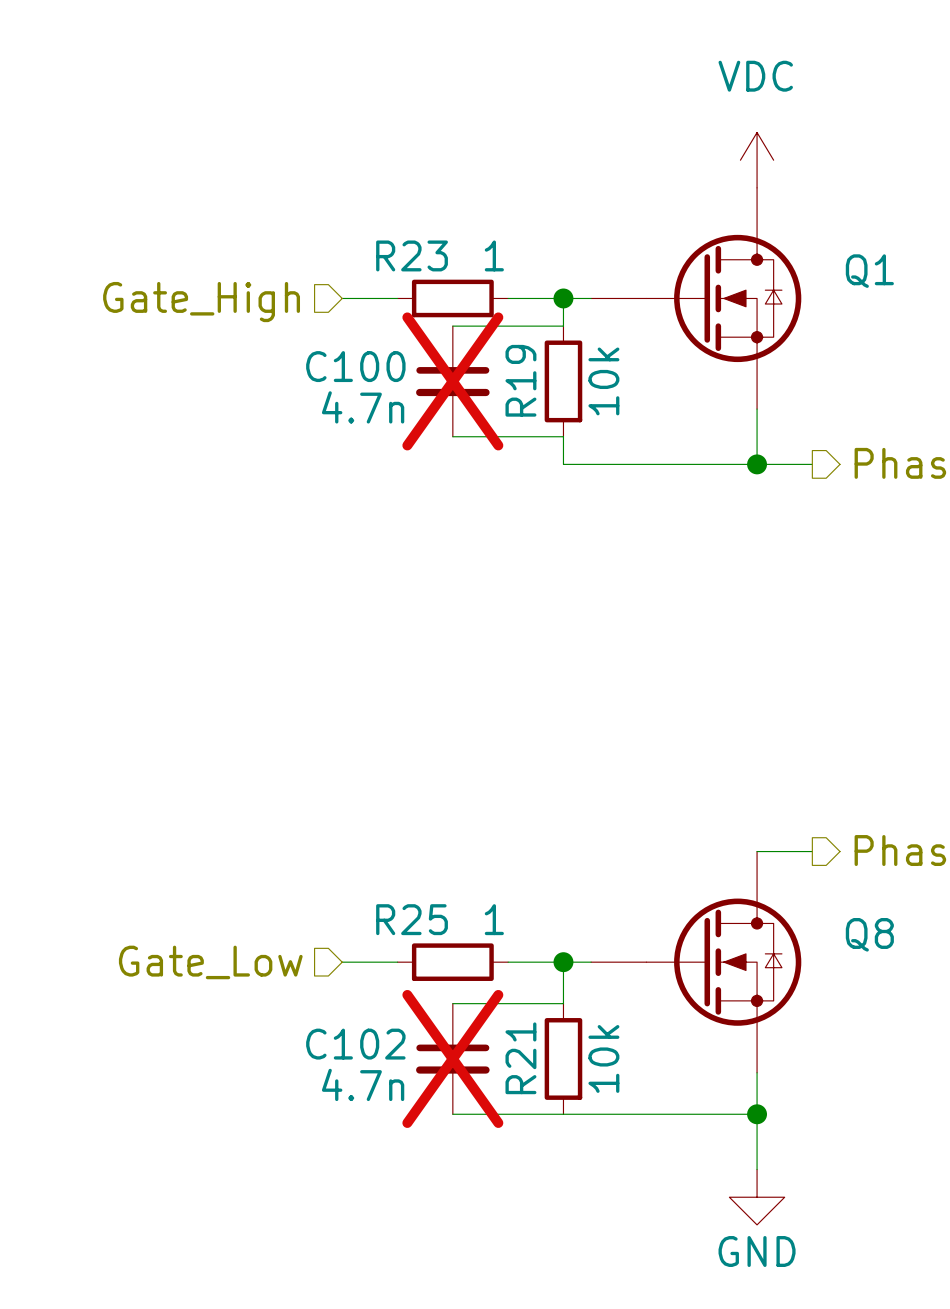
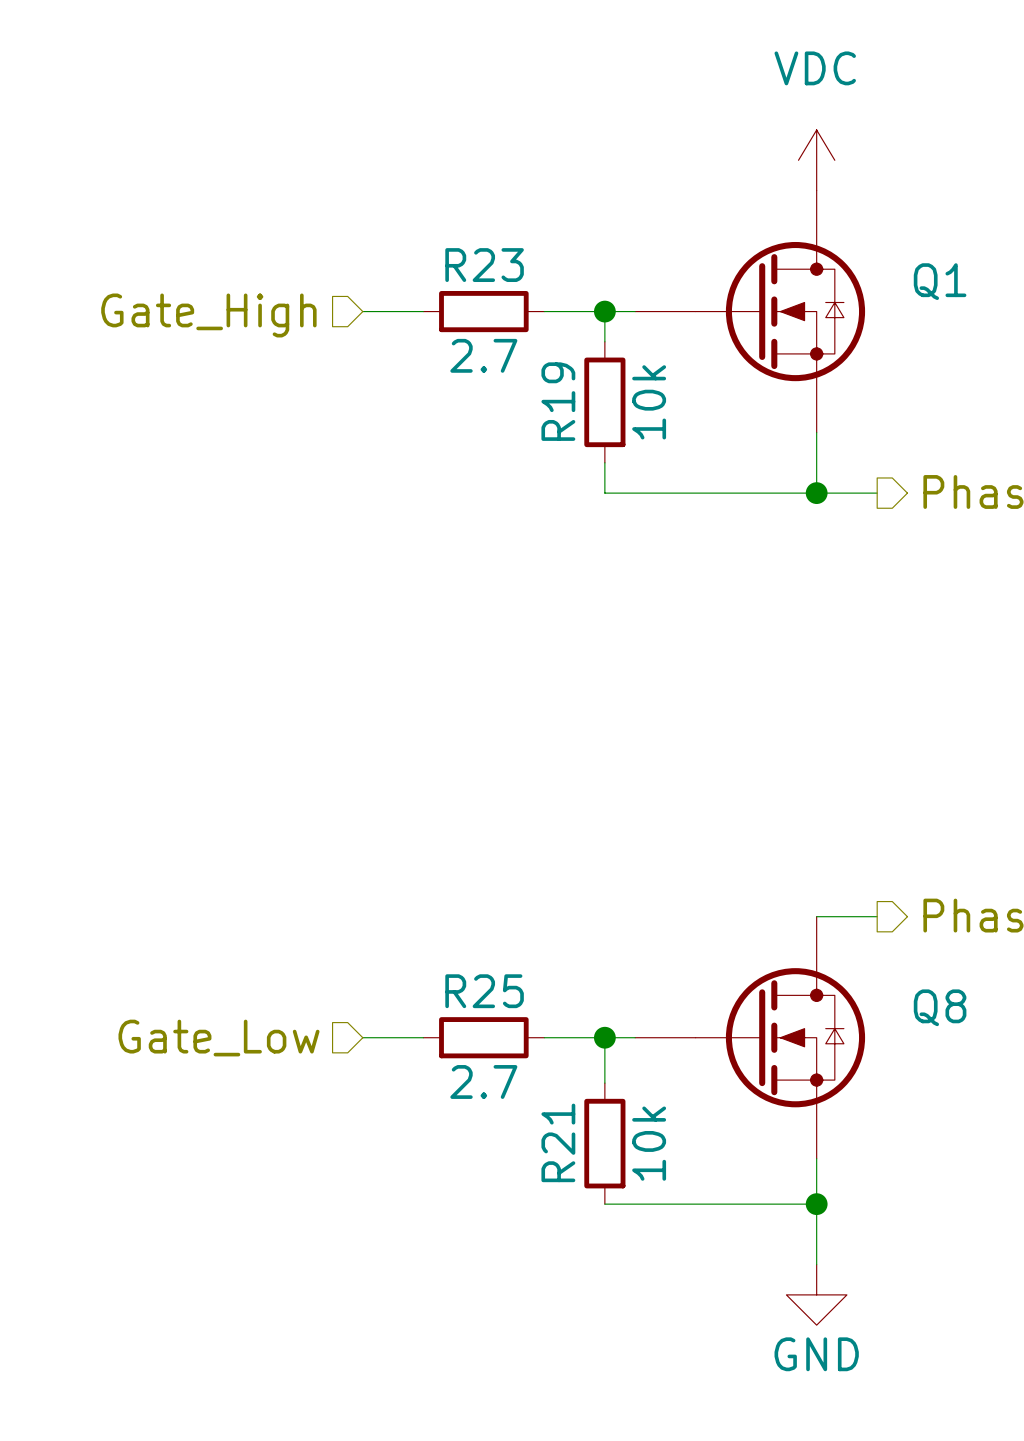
R23 name position: R23 (412, 255) -> R23 (484, 265)
R23 value: 1 (494, 255) -> 2.7 (483, 355)
wire: (452, 326) (563, 326) -> none
C100: 4.7n (452, 381) -> none
wire: (452, 436) (563, 436) -> none
R25 name position: R25 (412, 919) -> R25 (484, 991)
R25 value: 1 (494, 919) -> 2.7 (483, 1081)
wire: (452, 1003) (563, 1003) -> none
C102: 4.7n (452, 1058) -> none
wire: (452, 1114) (563, 1114) -> none

